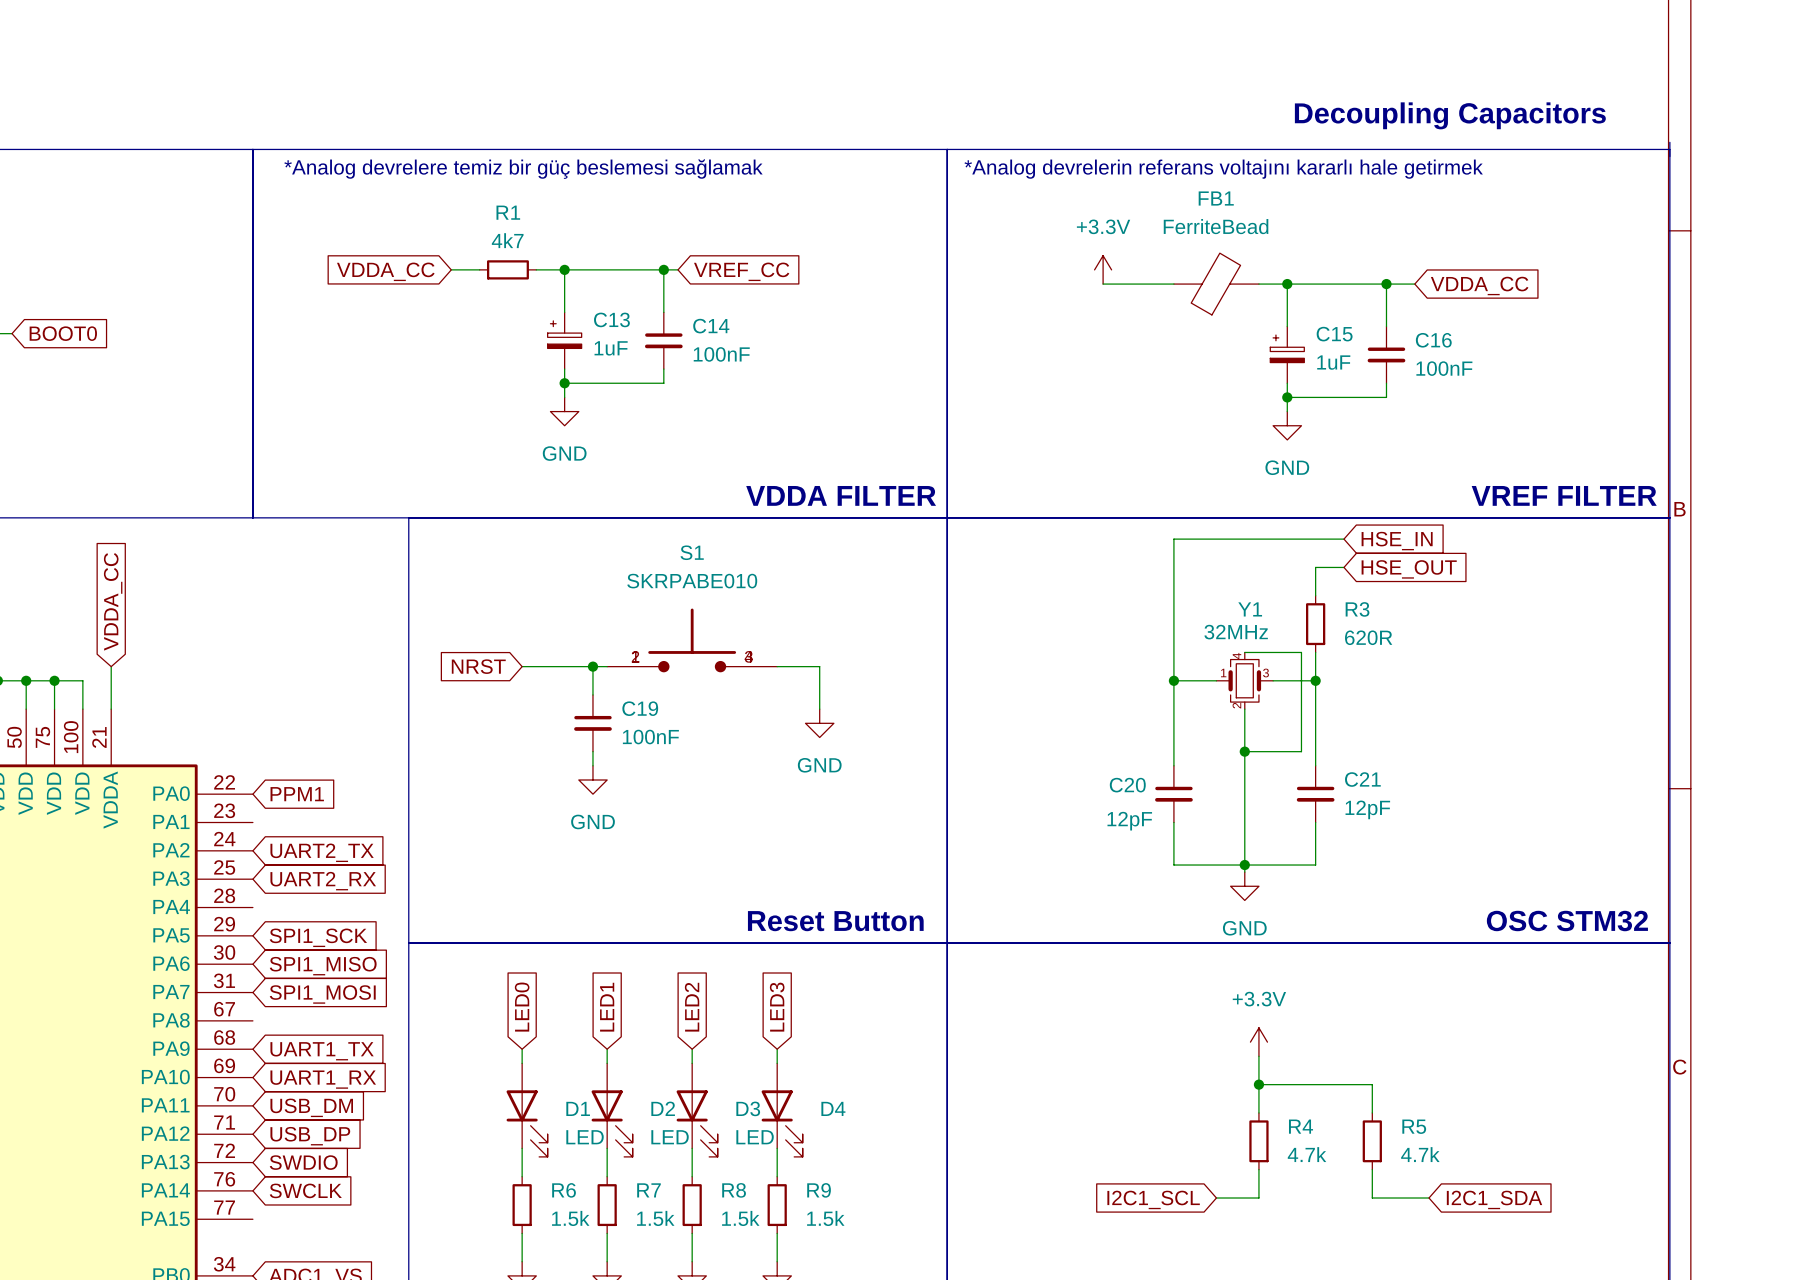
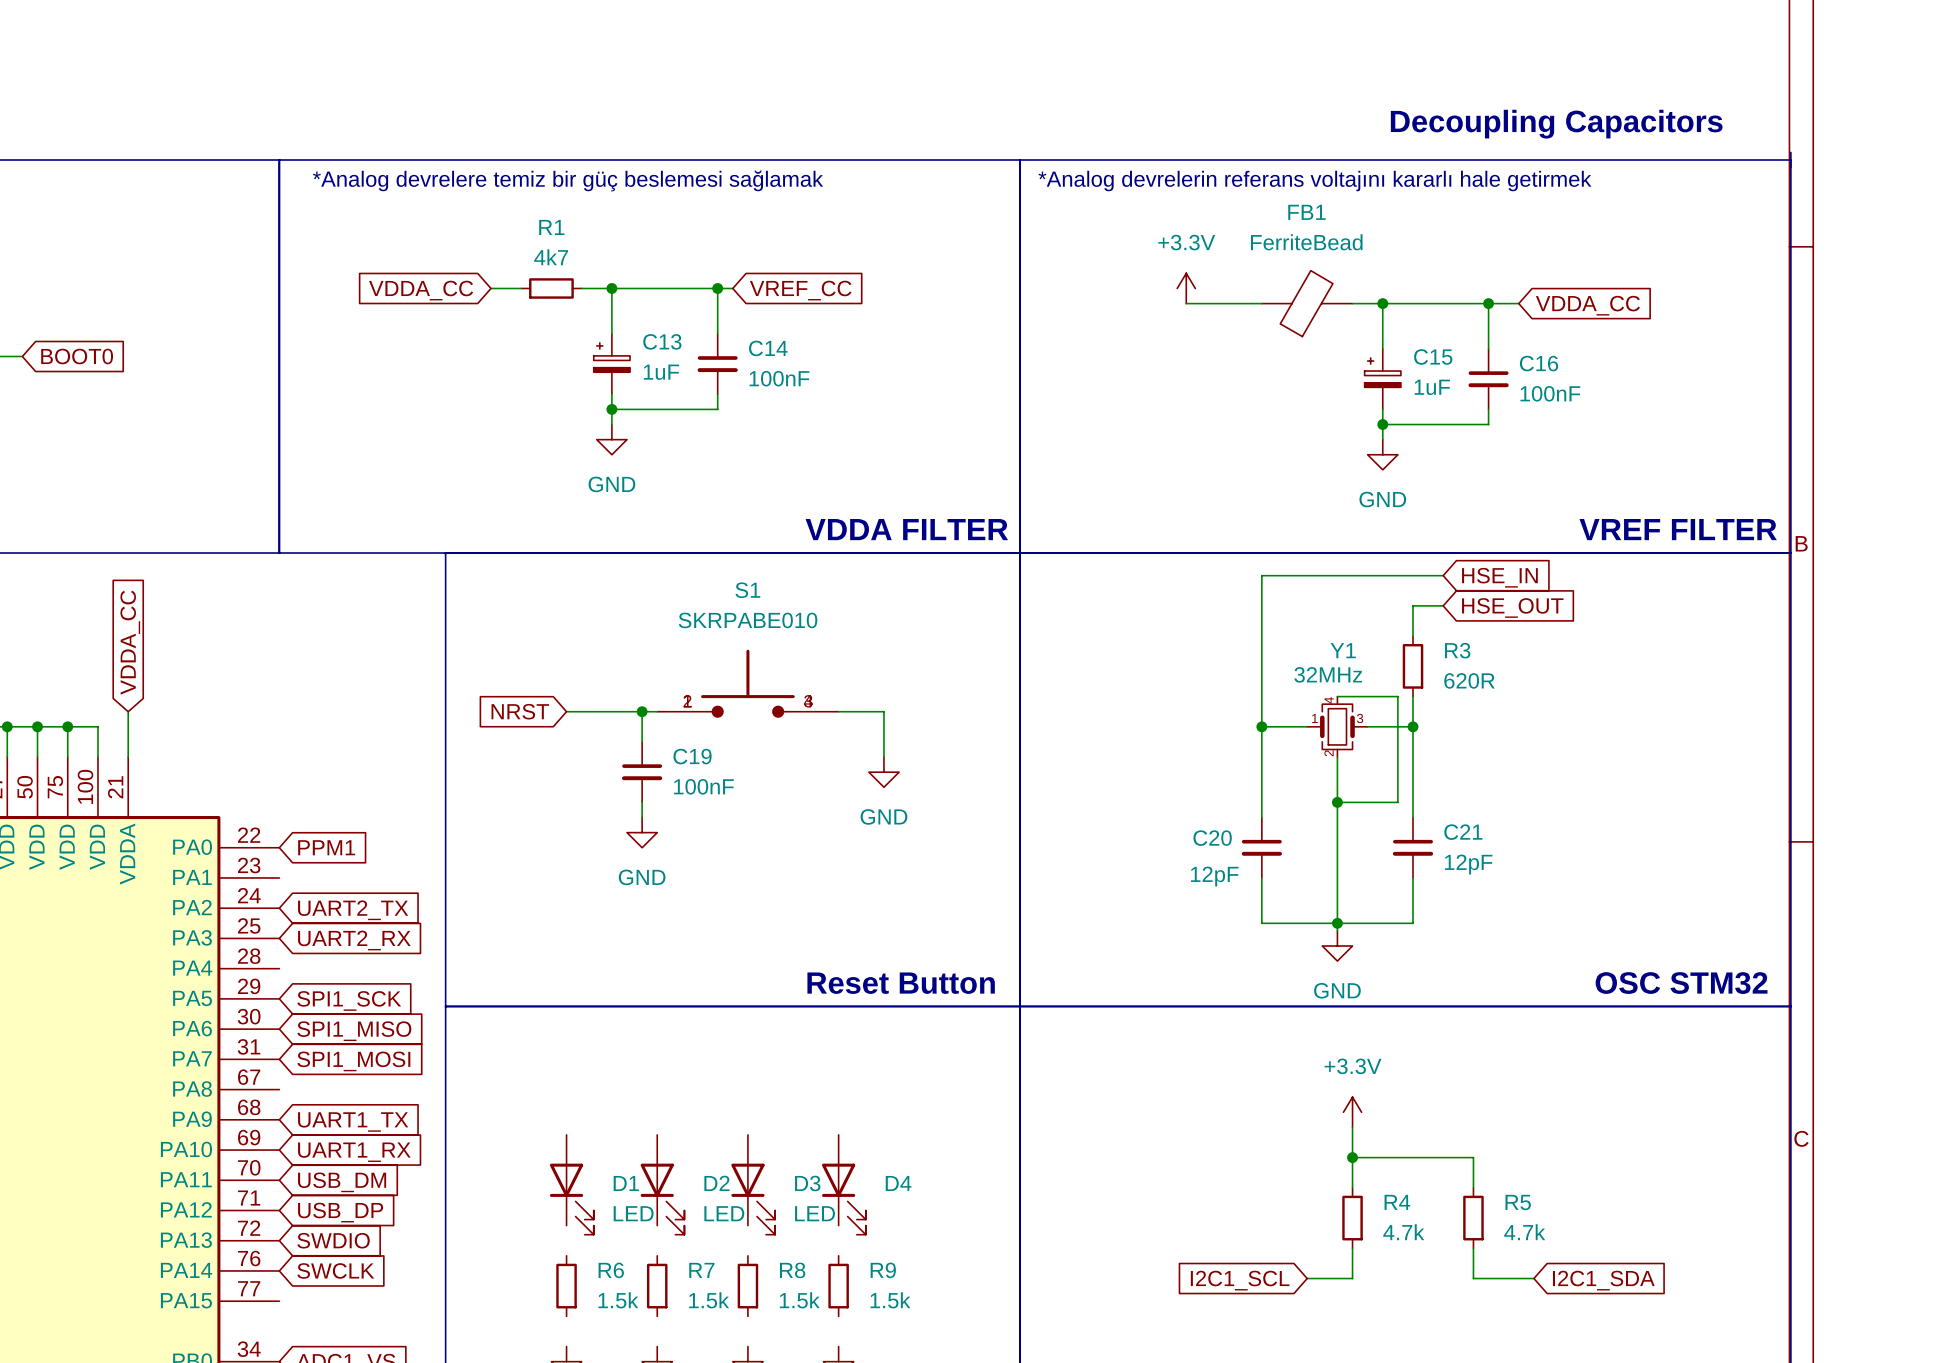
global label: LED0 (522, 1007) -> none
global label: LED1 (607, 1007) -> none
global label: LED2 (692, 1007) -> none
global label: LED3 (777, 1007) -> none
wire: (522, 1049) (522, 1063) -> none
wire: (607, 1049) (607, 1063) -> none
wire: (692, 1049) (692, 1063) -> none
wire: (777, 1049) (777, 1063) -> none
wire: (522, 1148) (522, 1176) -> none
wire: (607, 1148) (607, 1176) -> none
wire: (692, 1148) (692, 1176) -> none
wire: (777, 1148) (777, 1176) -> none
wire: (522, 1233) (522, 1261) -> none
wire: (607, 1233) (607, 1261) -> none
wire: (692, 1233) (692, 1261) -> none
wire: (777, 1233) (777, 1261) -> none

